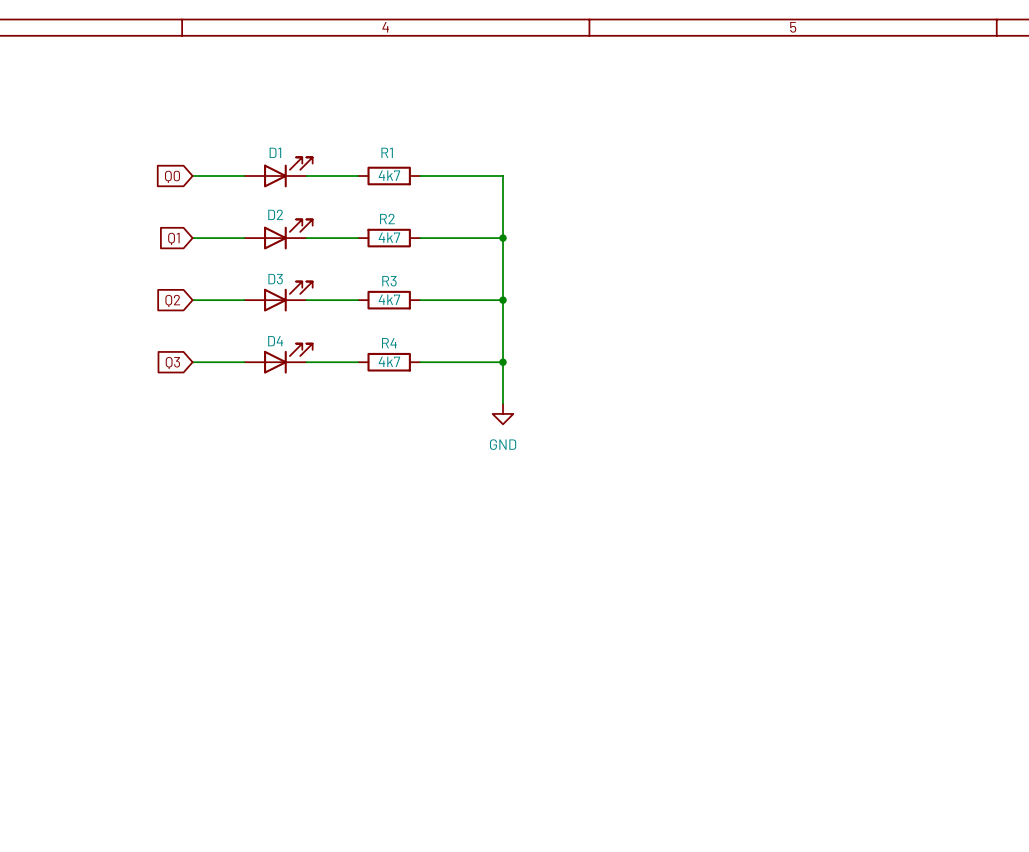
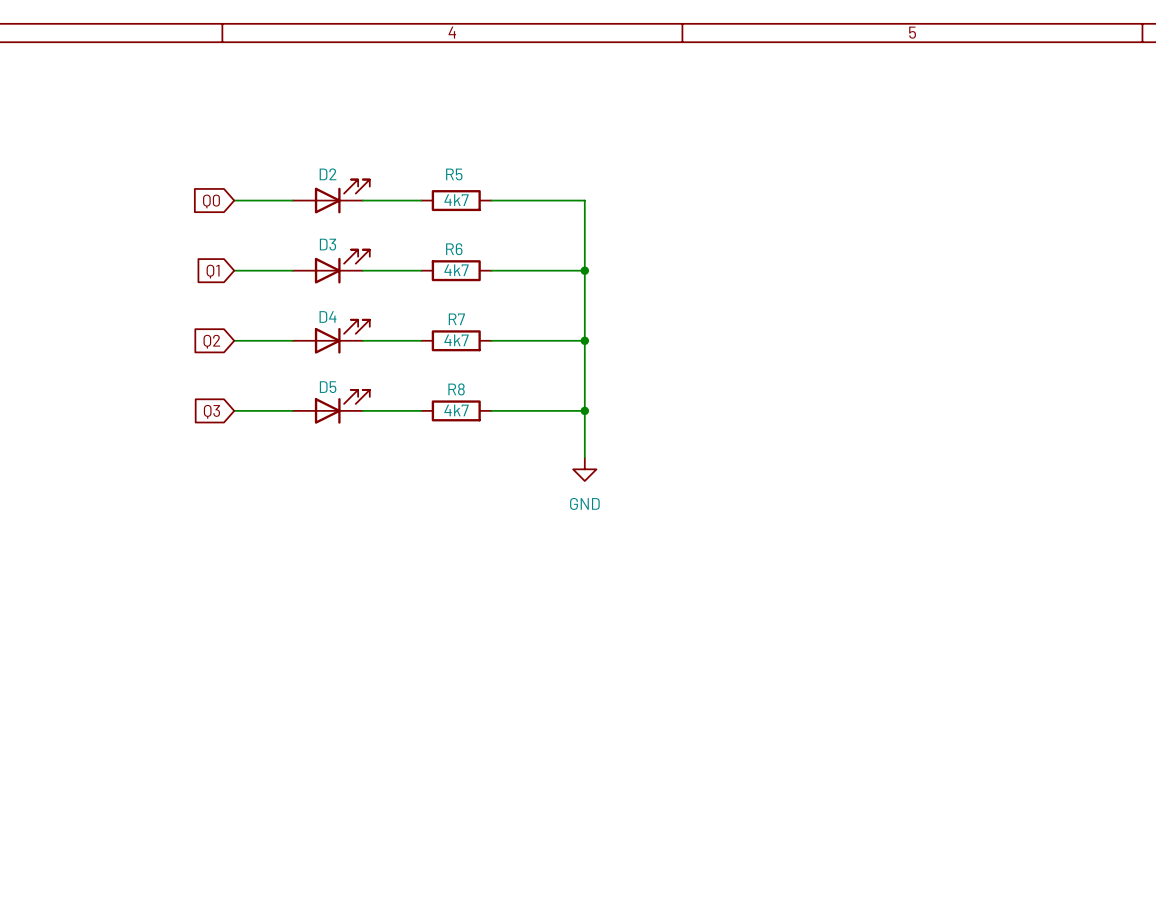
D1 name: D1 (275, 152) -> D2 (328, 174)
R1 name: R1 (387, 152) -> R5 (454, 174)
D2 name: D2 (275, 214) -> D3 (327, 244)
R2 name: R2 (387, 219) -> R6 (454, 249)
D3 name: D3 (275, 279) -> D4 (328, 316)
R3 name: R3 (389, 281) -> R7 (456, 319)
D4 name: D4 (275, 341) -> D5 (328, 387)
R4 name: R4 (389, 343) -> R8 (456, 389)

